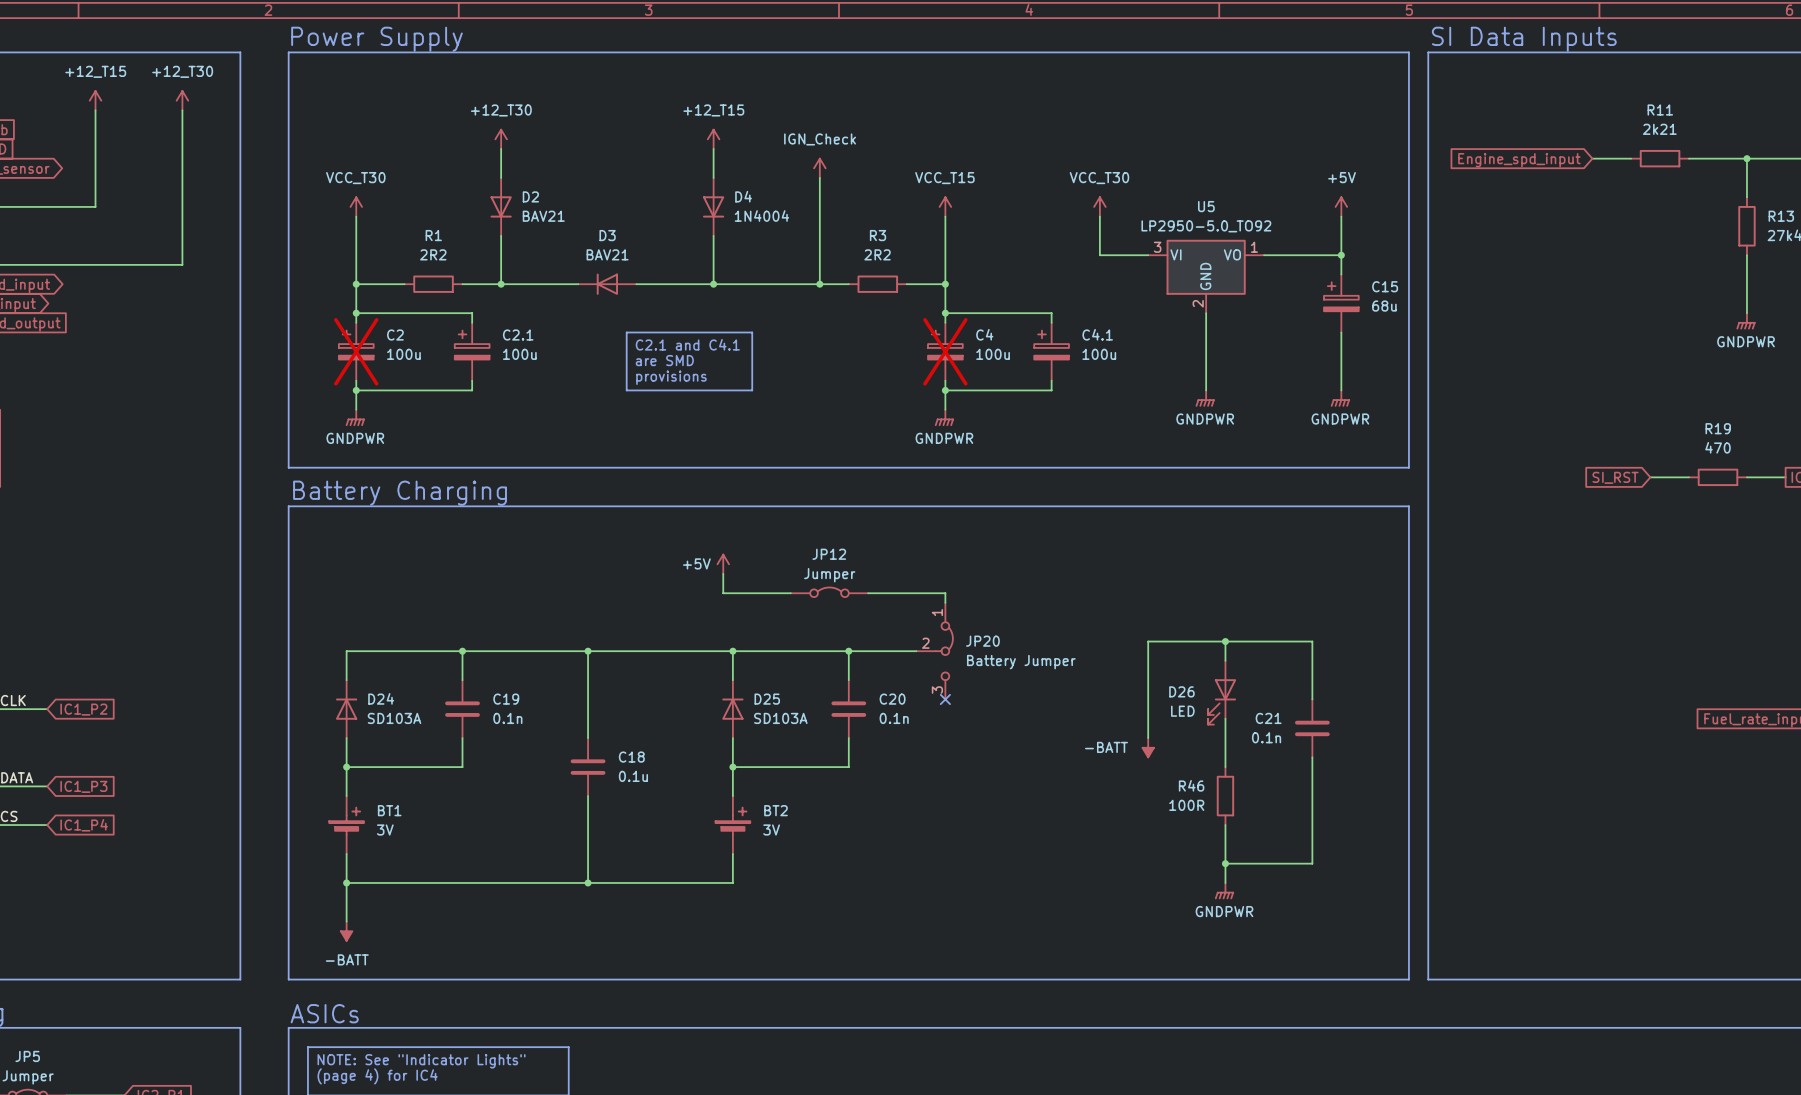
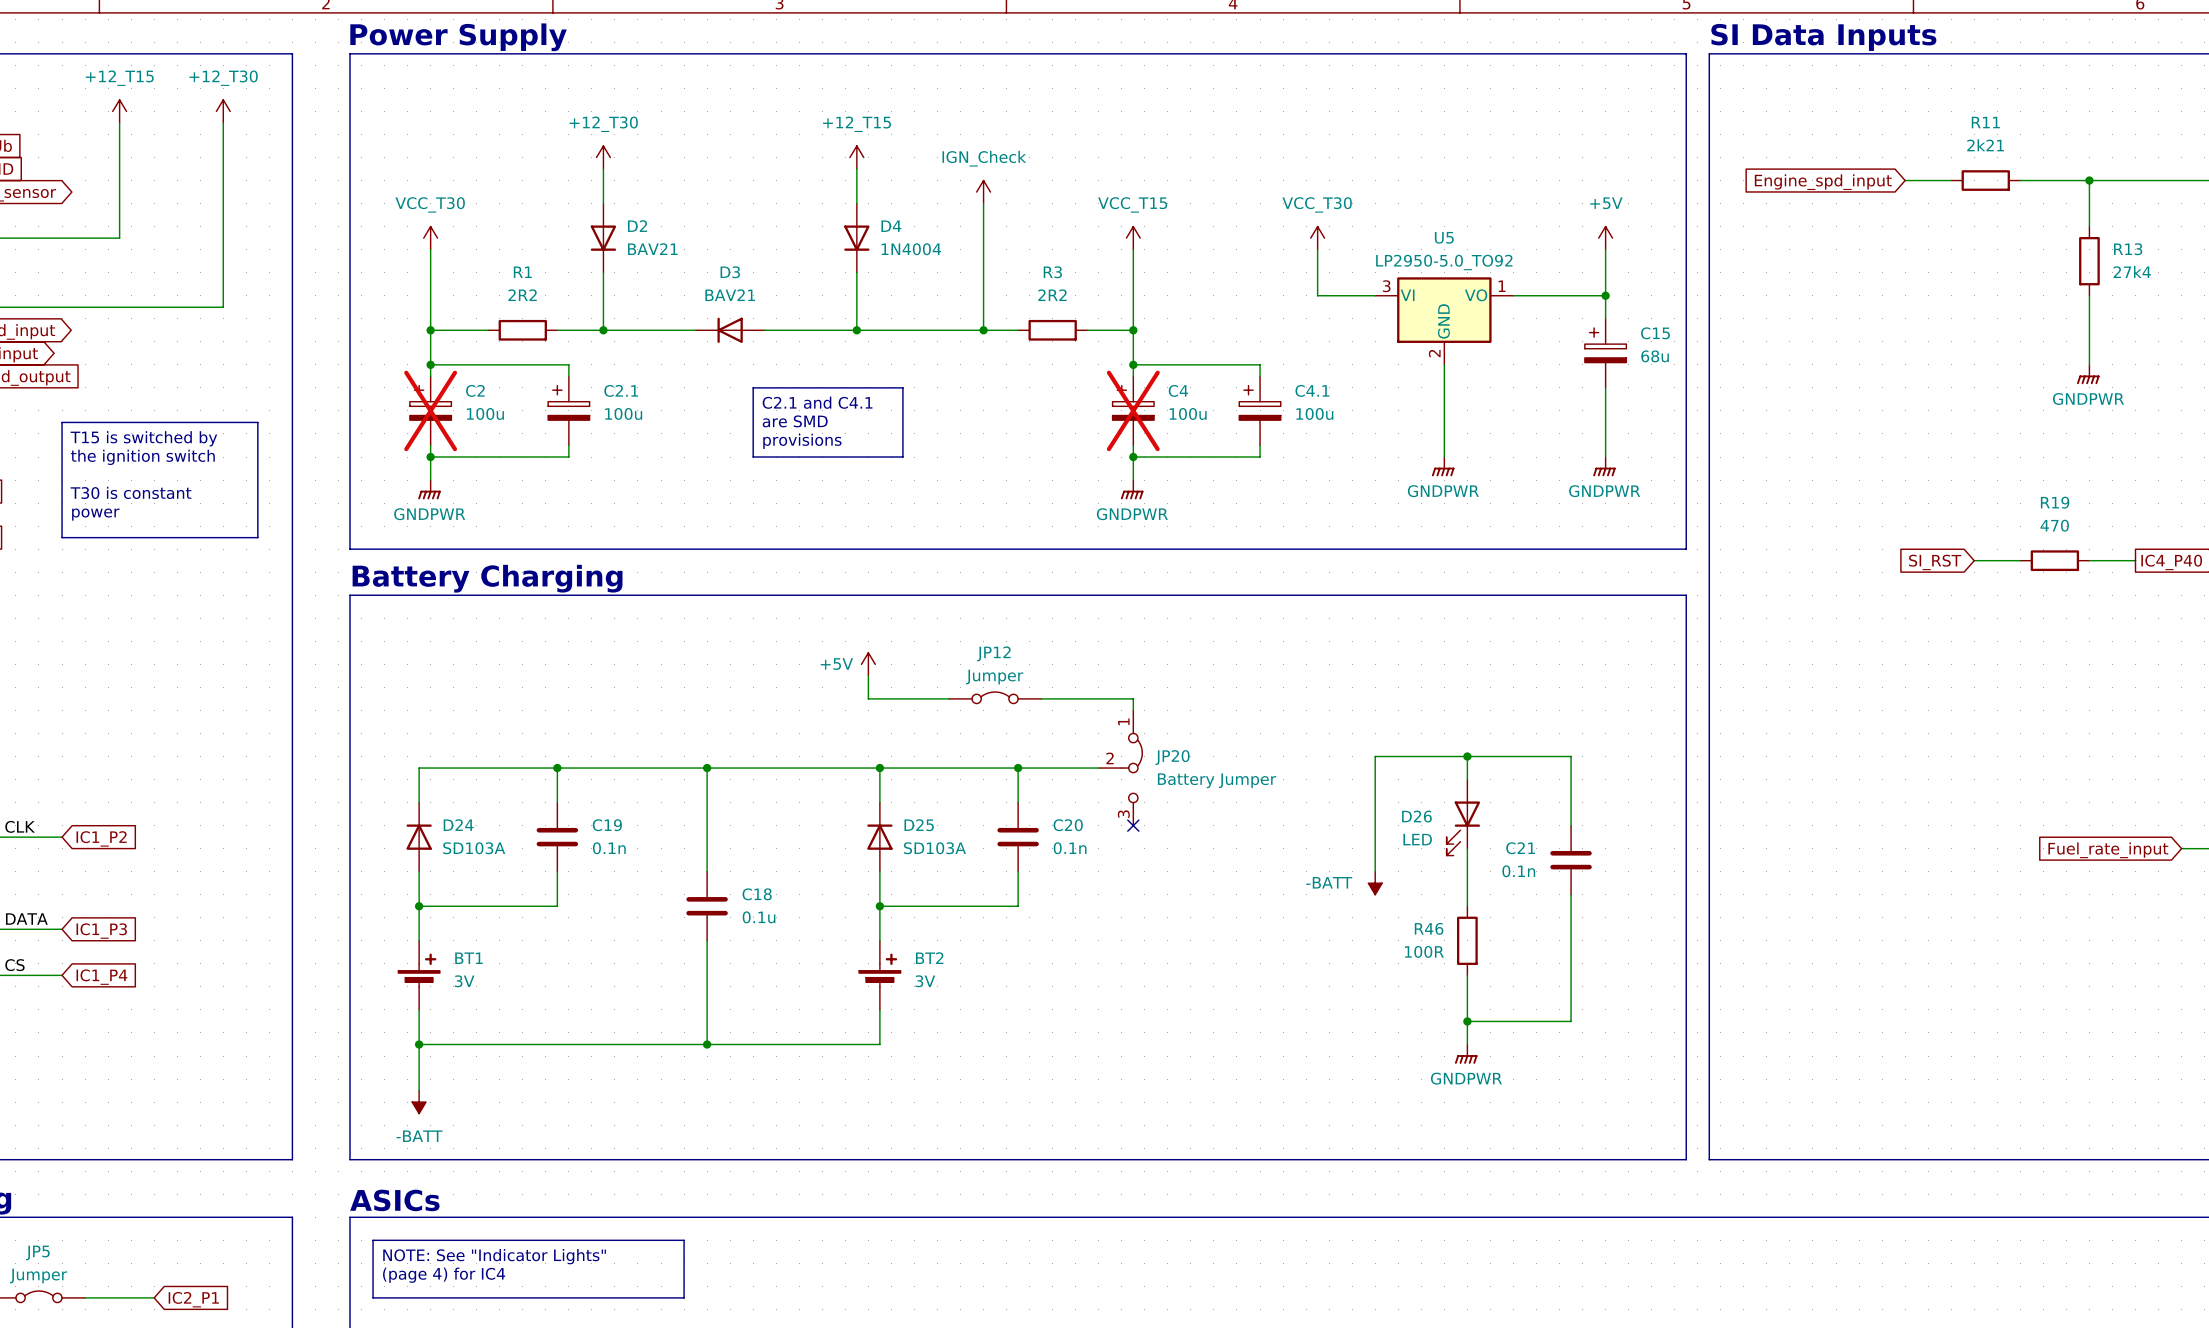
line: none -> (62, 422) (257, 422) (257, 537) (62, 537) (62, 422)
text: none -> T15 is switched by (143, 438)
text: none -> the ignition switch (142, 457)
text: none -> T30 is constant (131, 492)
text: none -> power (95, 514)

